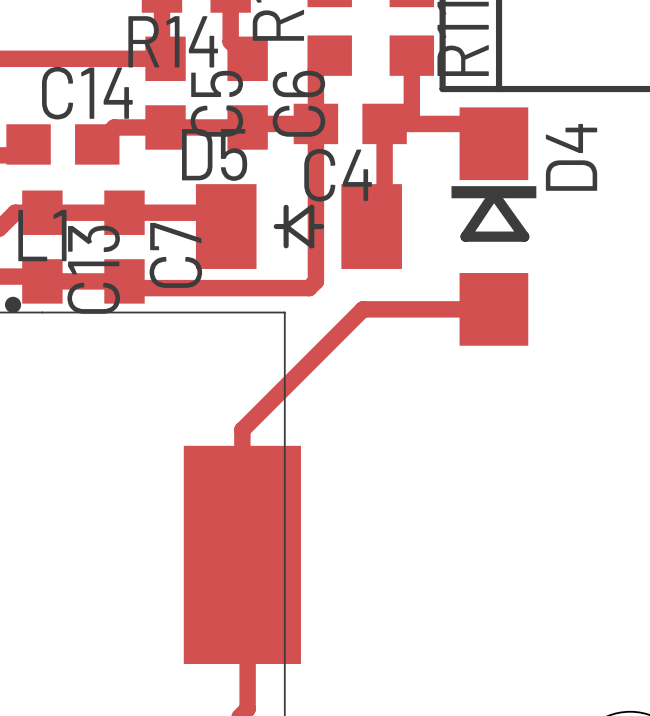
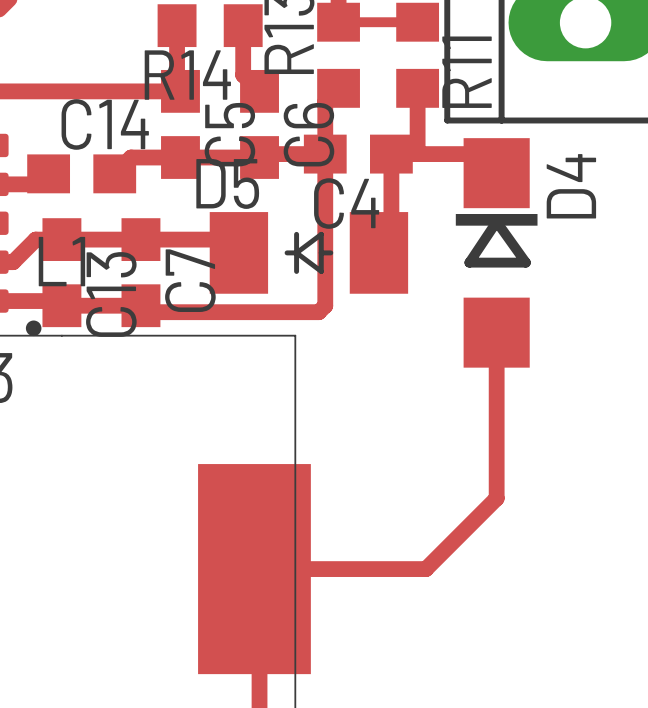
track: (493, 309) (363, 309) (242, 430) (242, 554) -> (496, 332) (496, 498) (425, 569) (254, 569)

